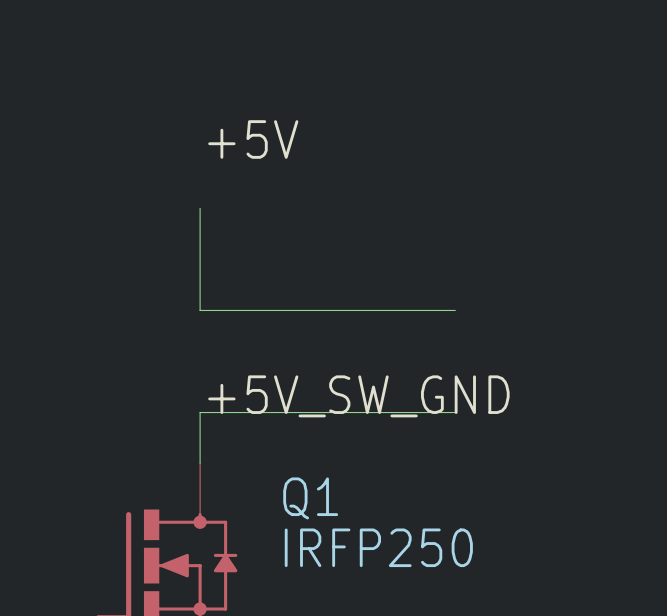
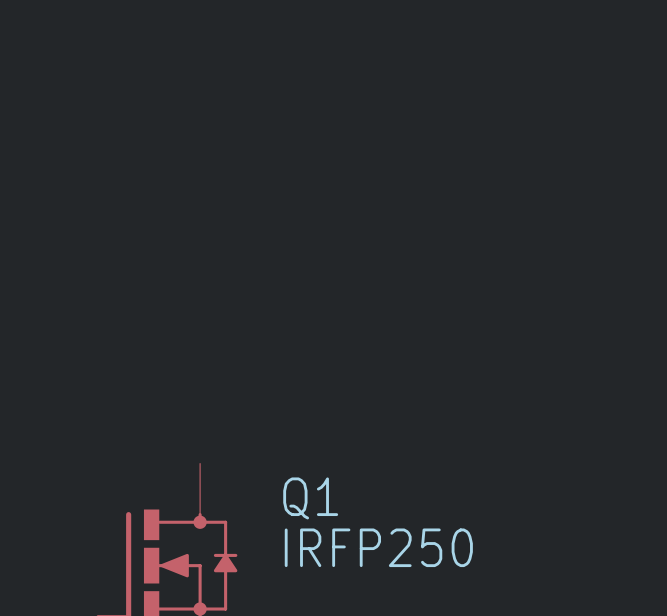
label: +5V (253, 139) -> none
wire: (200, 208) (200, 310) (455, 310) -> none
label: +5V_SW_GND (358, 396) -> none
wire: (455, 412) (200, 412) (200, 463) -> none

